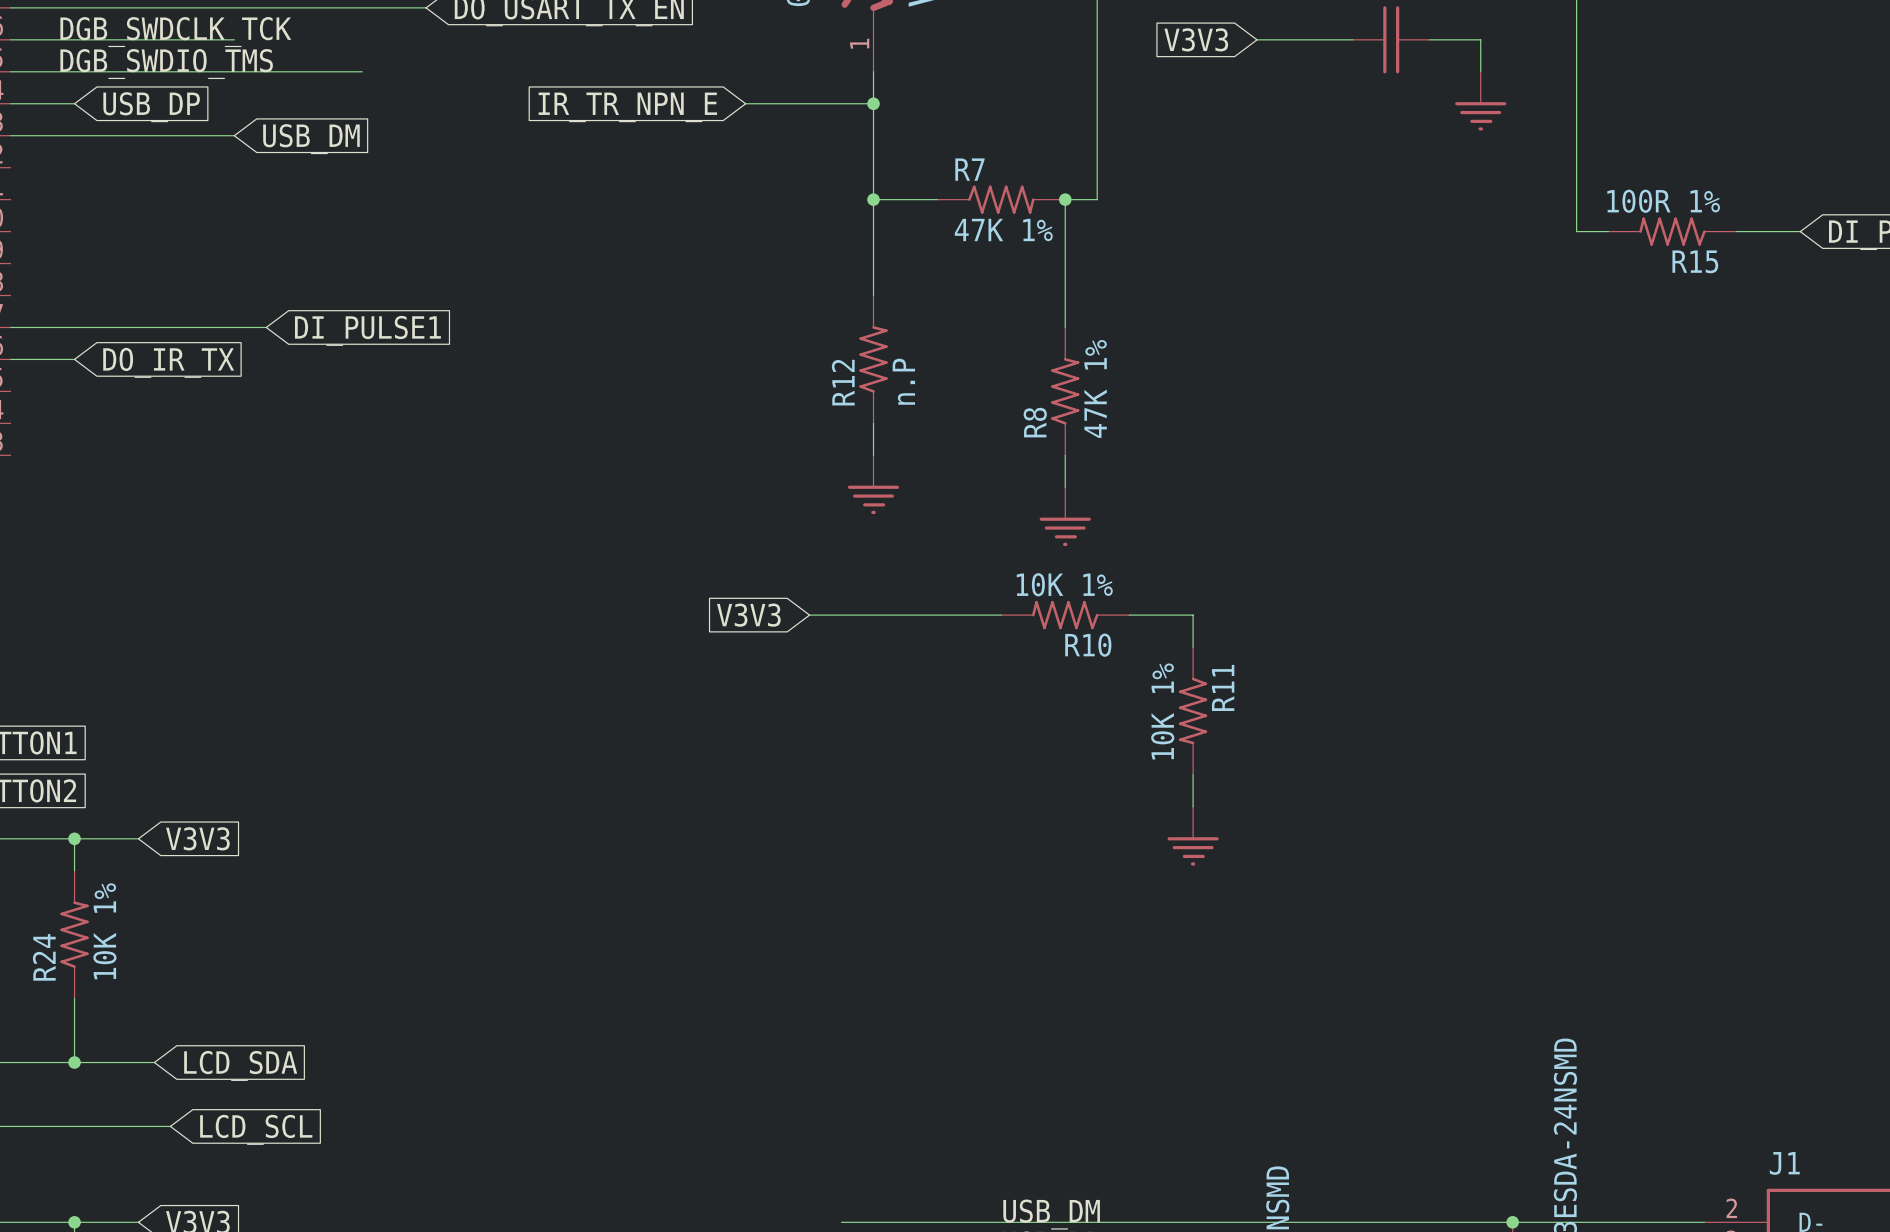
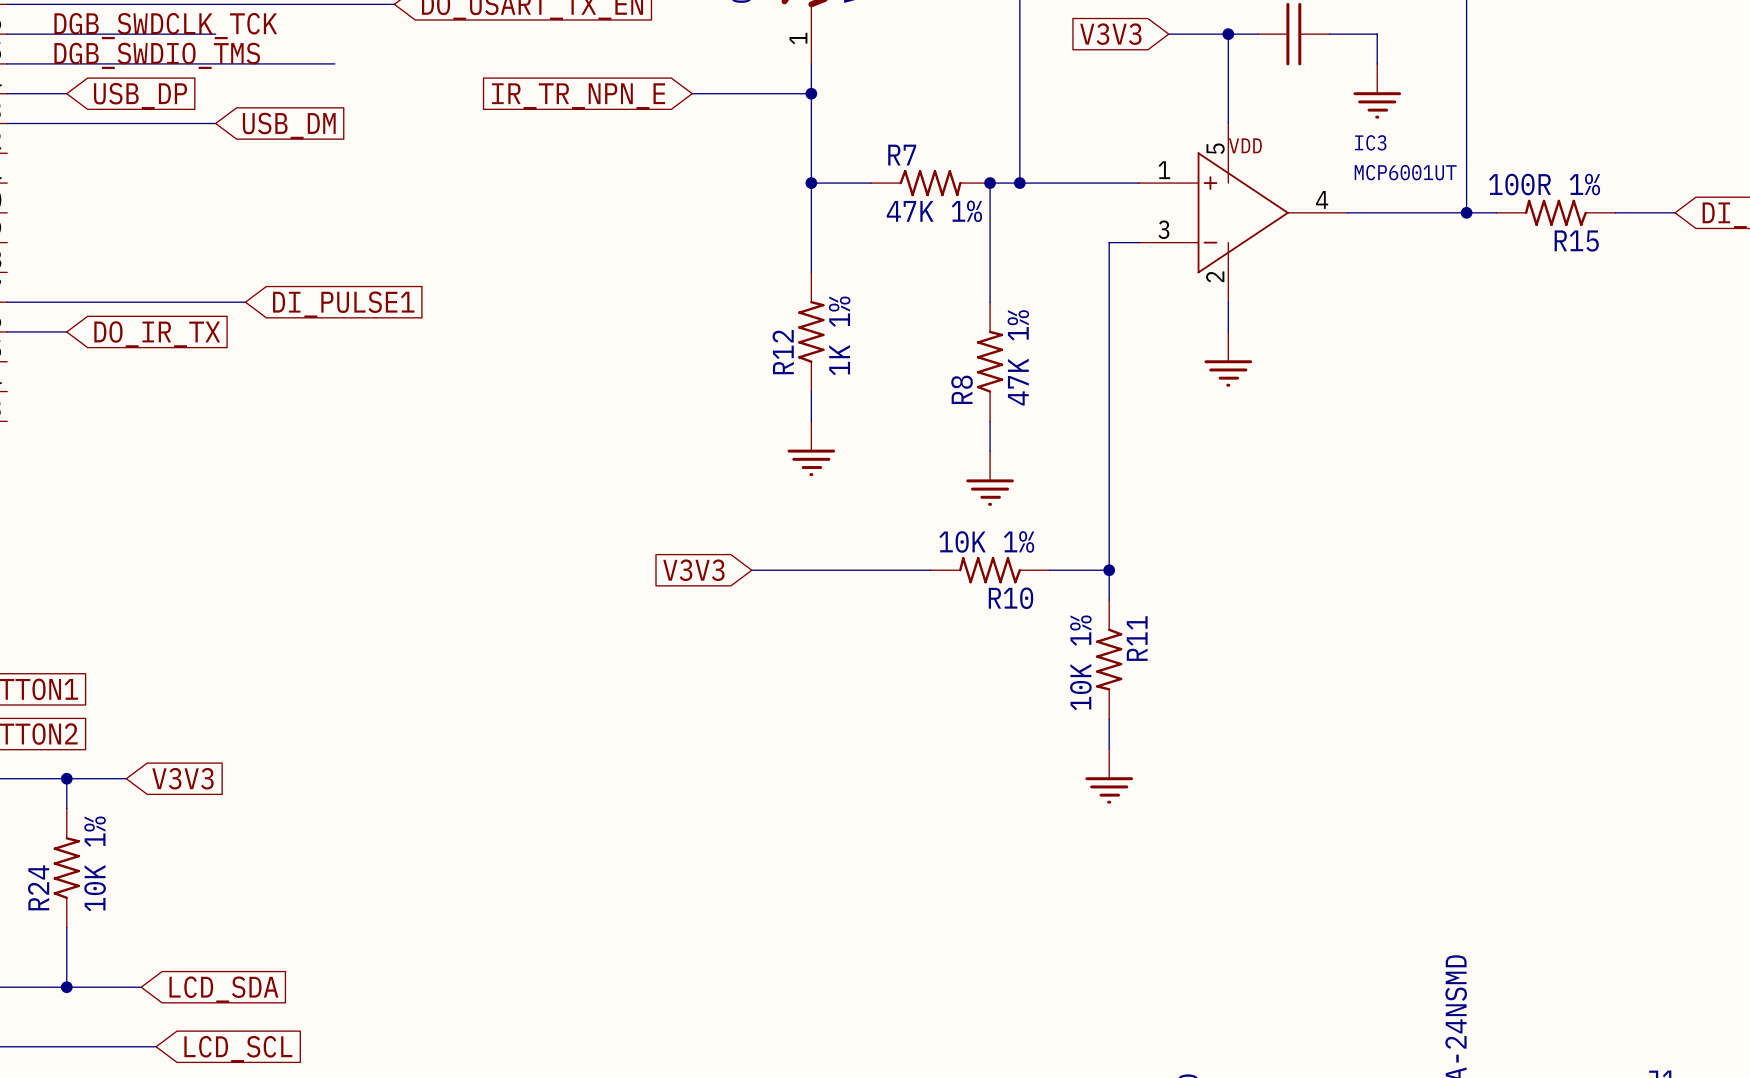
wire: none -> (1228, 34) (1228, 123)
junction: none -> (1228, 34)
wire: none -> (1019, 183) (1138, 183)
junction: none -> (1019, 183)
IC3: none -> MCP6001UT (1243, 212)
wire: none -> (1347, 212) (1466, 212)
junction: none -> (1466, 212)
wire: none -> (1138, 242) (1109, 242) (1109, 570)
wire: none -> (1228, 302) (1228, 331)
R12 value: n.P (903, 381) -> 1K 1% (839, 335)
power symbol: none -> (1228, 359)
junction: none -> (1109, 570)

